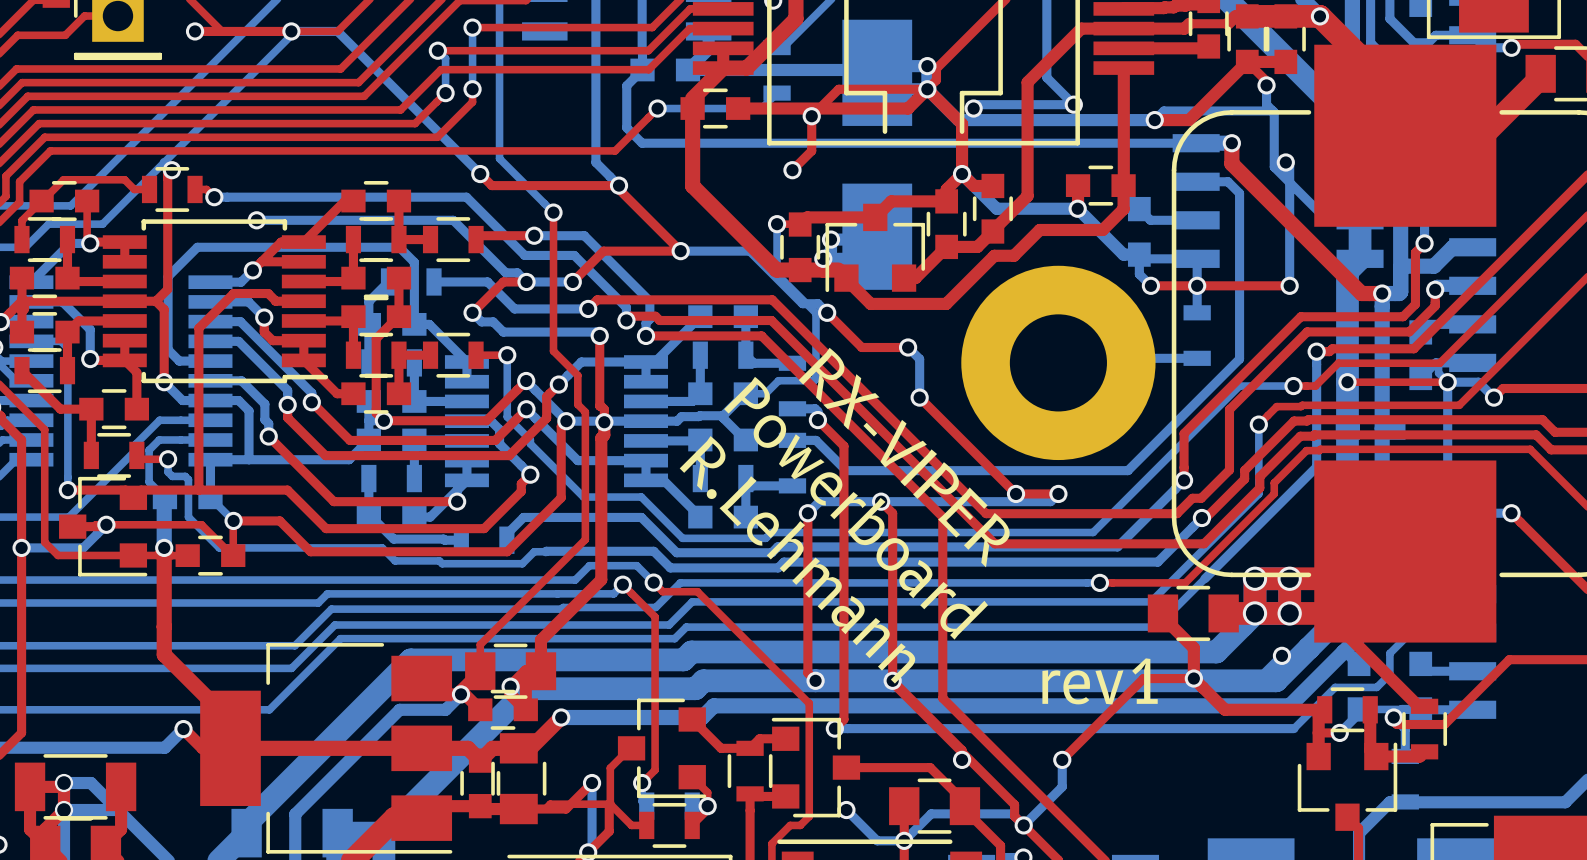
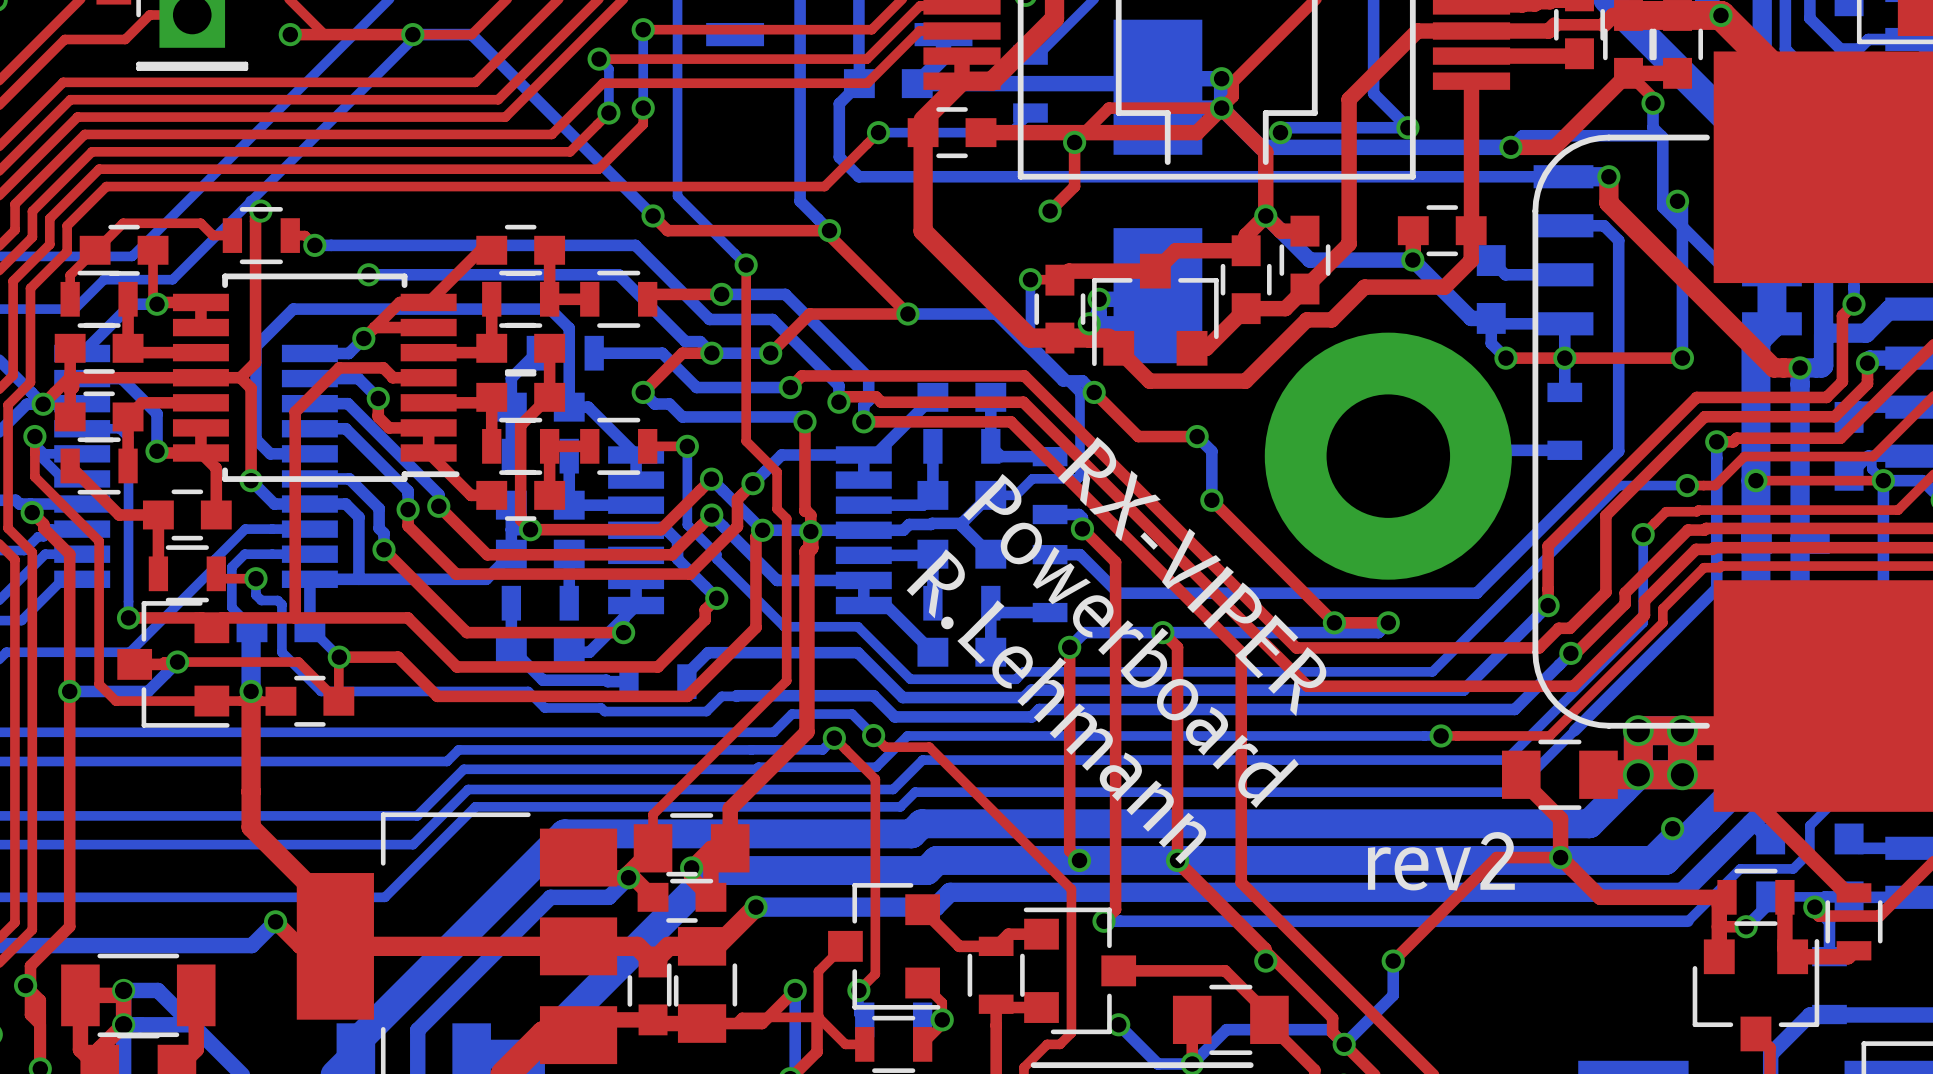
text: rev1 (1100, 681) -> rev2 (1441, 861)

